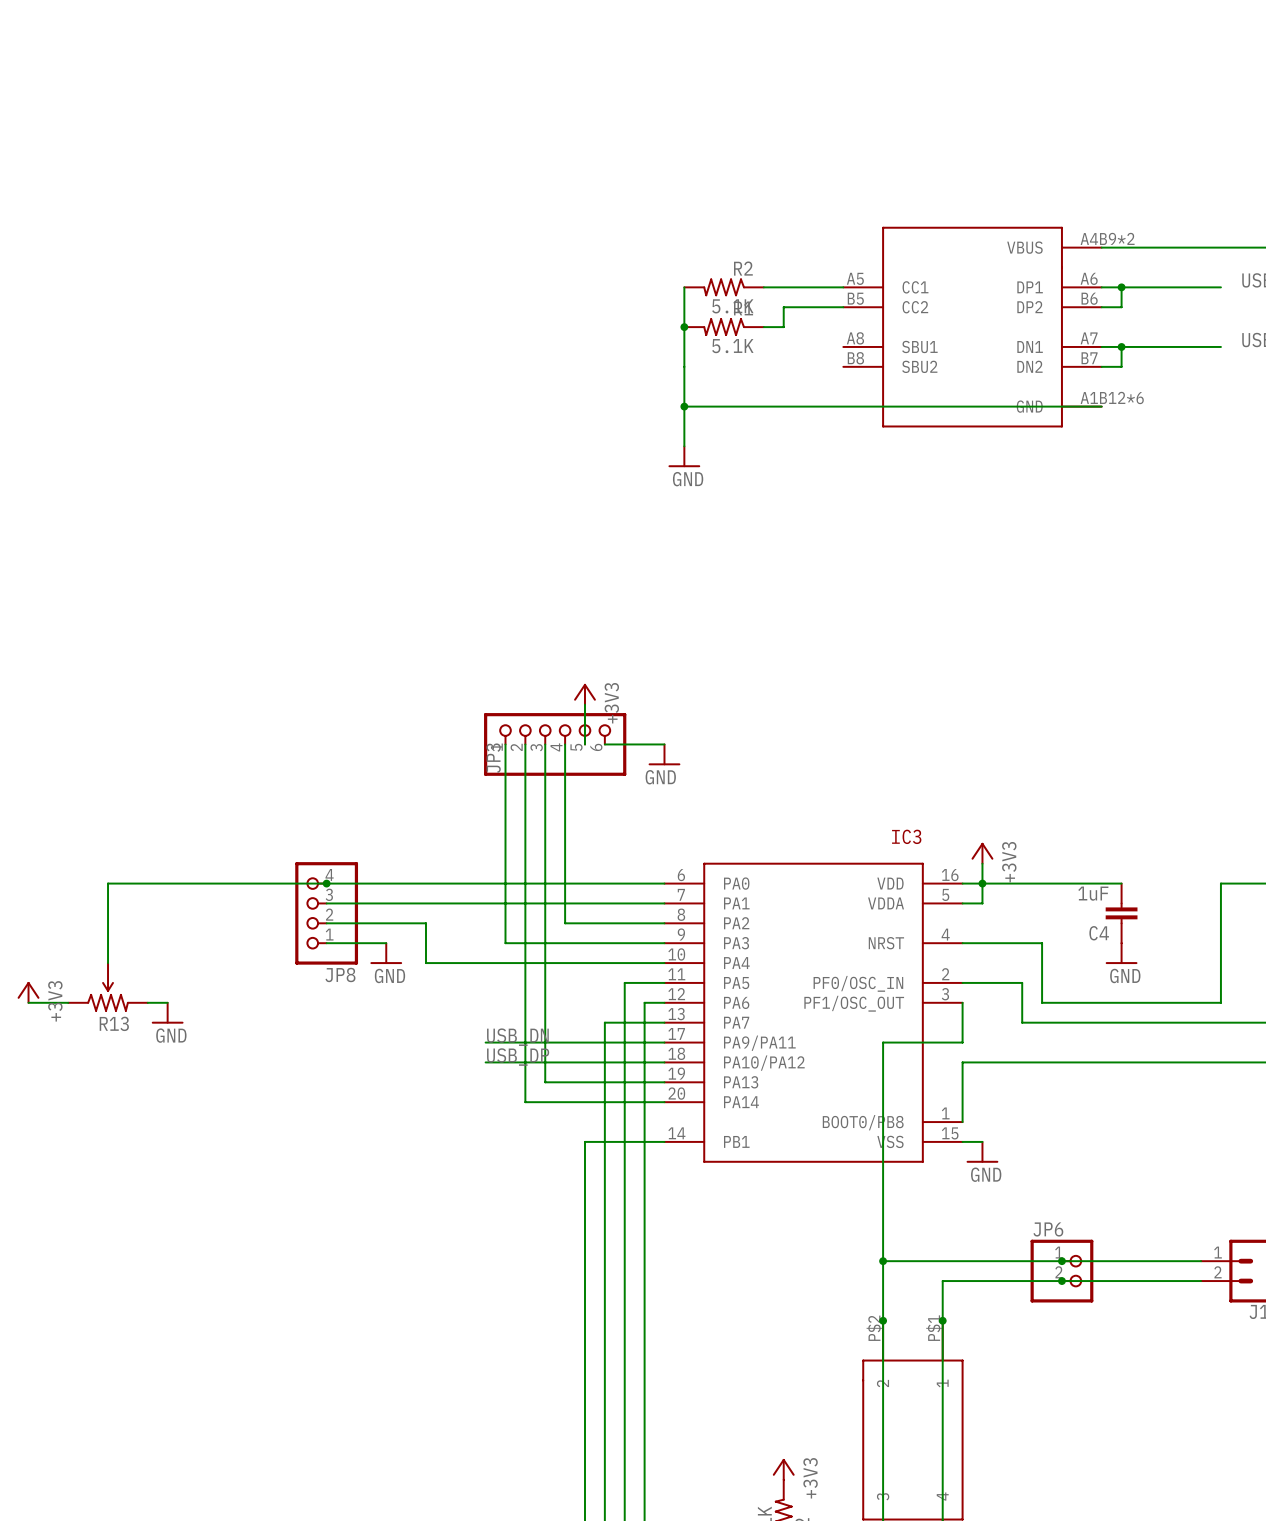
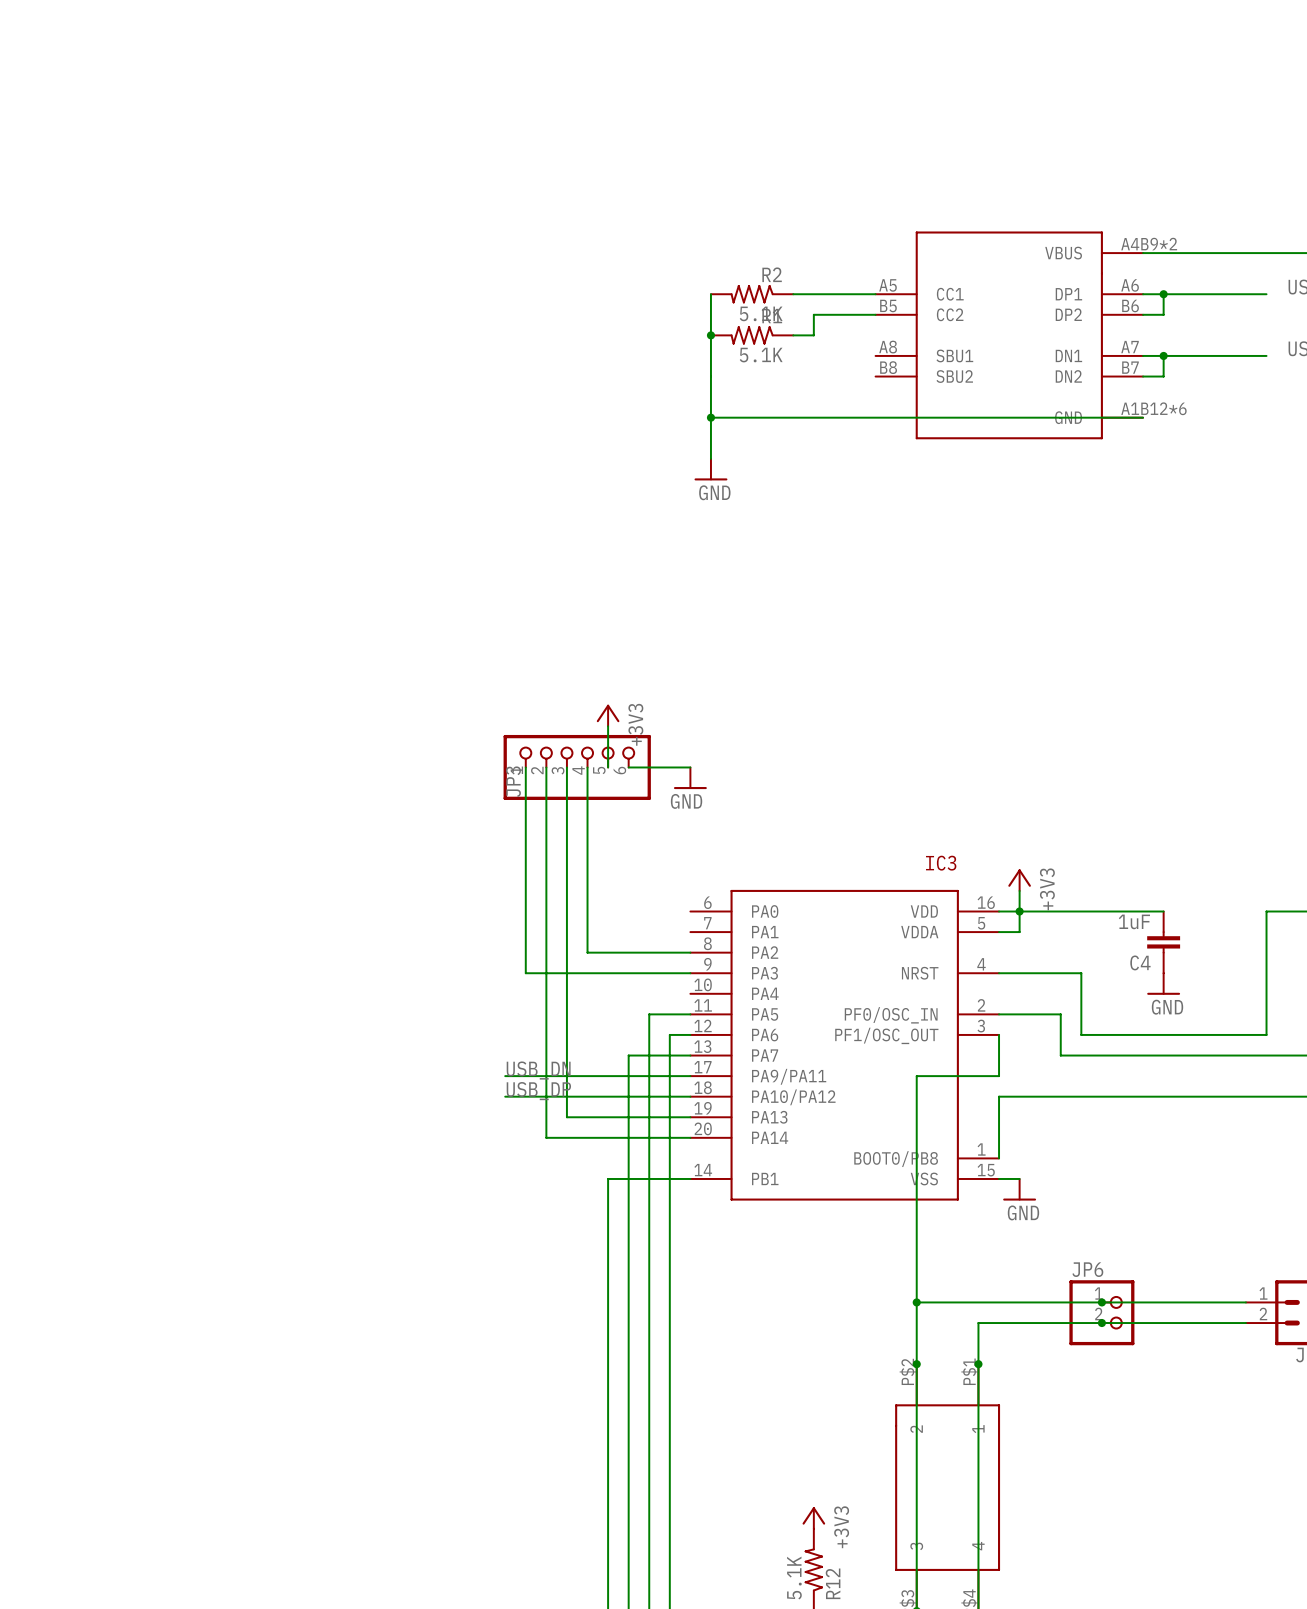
junction: (326, 883) -> none
wire: (664, 883) (108, 883) (108, 963) -> none
wire: (326, 903) (664, 903) -> none
JP8: (326, 913) -> none
wire: (326, 923) (426, 923) (426, 963) (664, 963) -> none
wire: (326, 943) (386, 943) -> none
power symbol: GND (386, 953) -> none
R13: (108, 987) -> none
power symbol: +3V3 (28, 992) -> none
wire: (28, 1002) (68, 1002) -> none
wire: (147, 1002) (167, 1002) -> none
power symbol: GND (167, 1013) -> none

